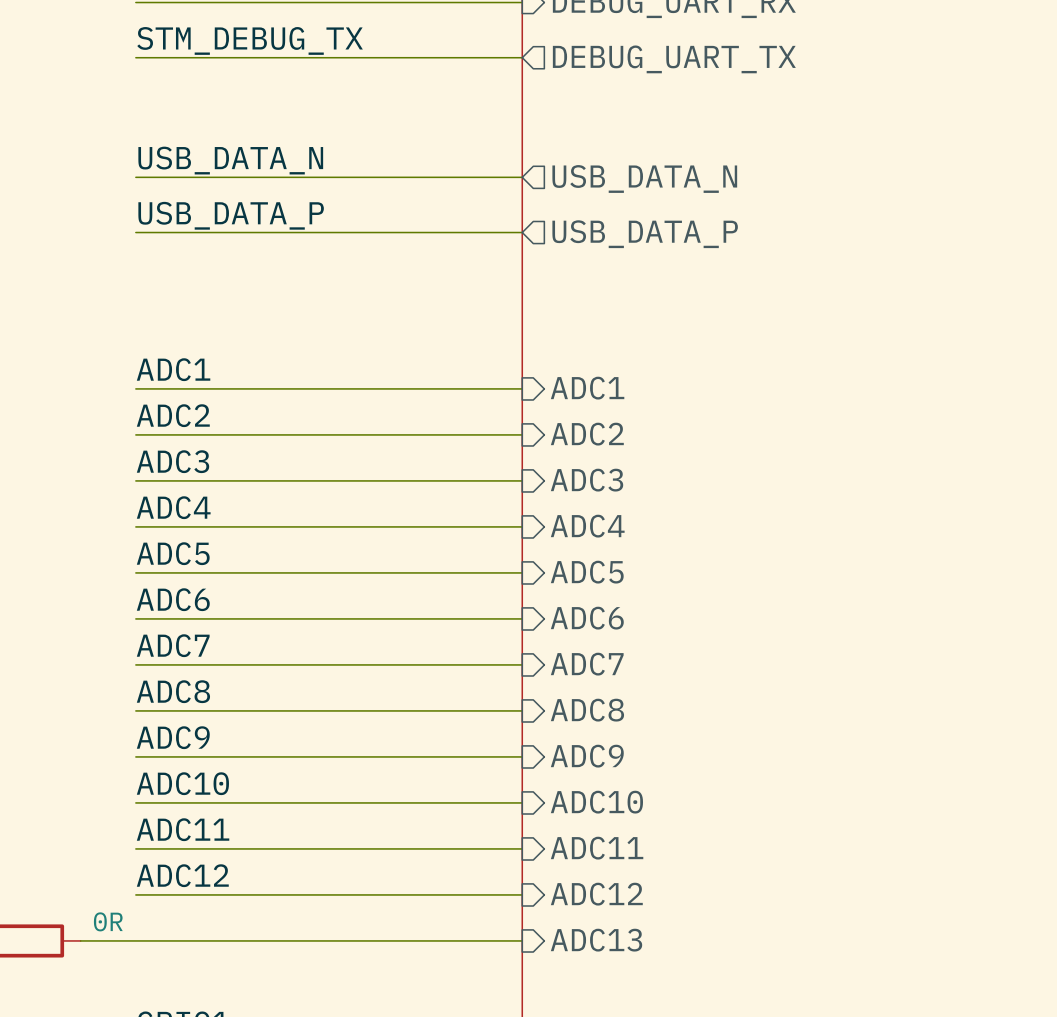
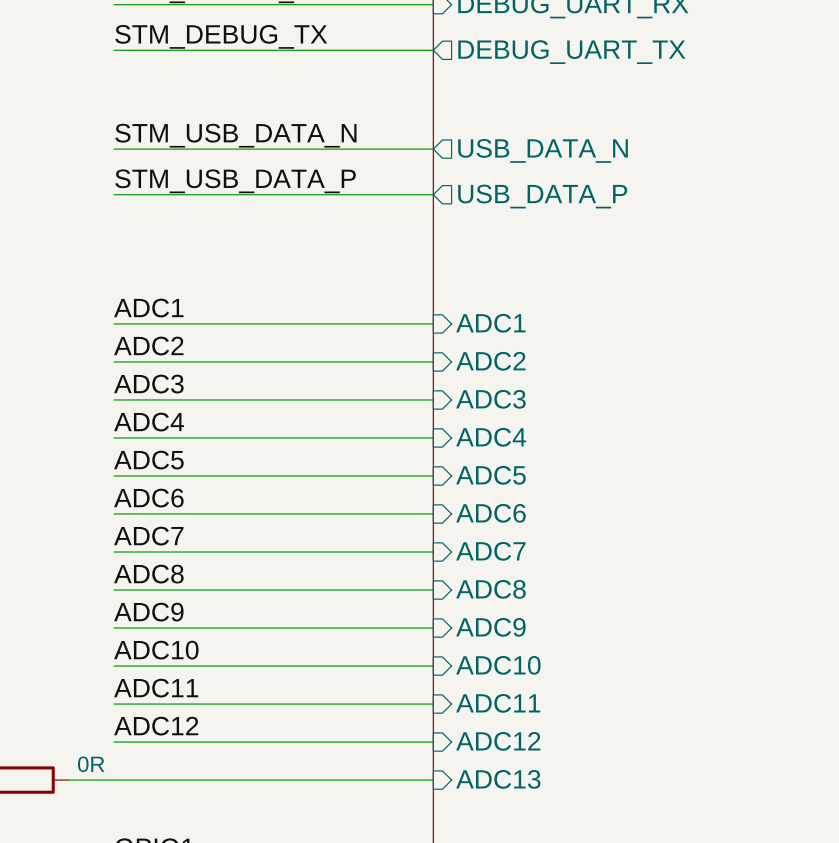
label: USB_DATA_N (230, 160) -> STM_USB_DATA_N (235, 135)
label: USB_DATA_P (231, 215) -> STM_USB_DATA_P (235, 181)

